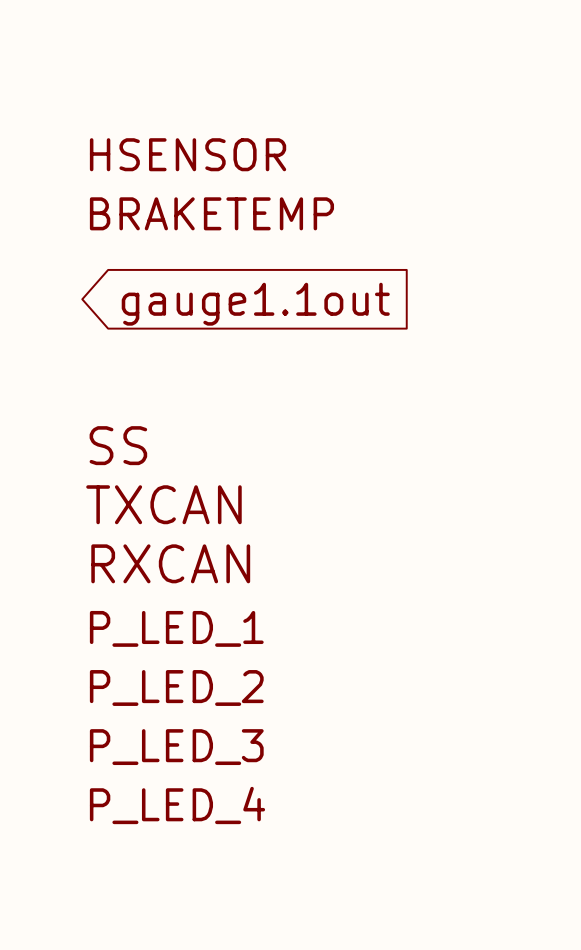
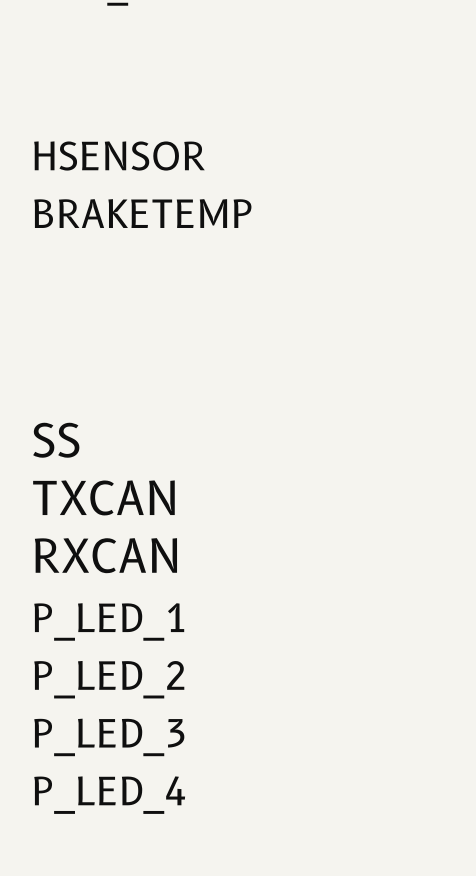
global label: gauge1.1out (255, 304) -> none

